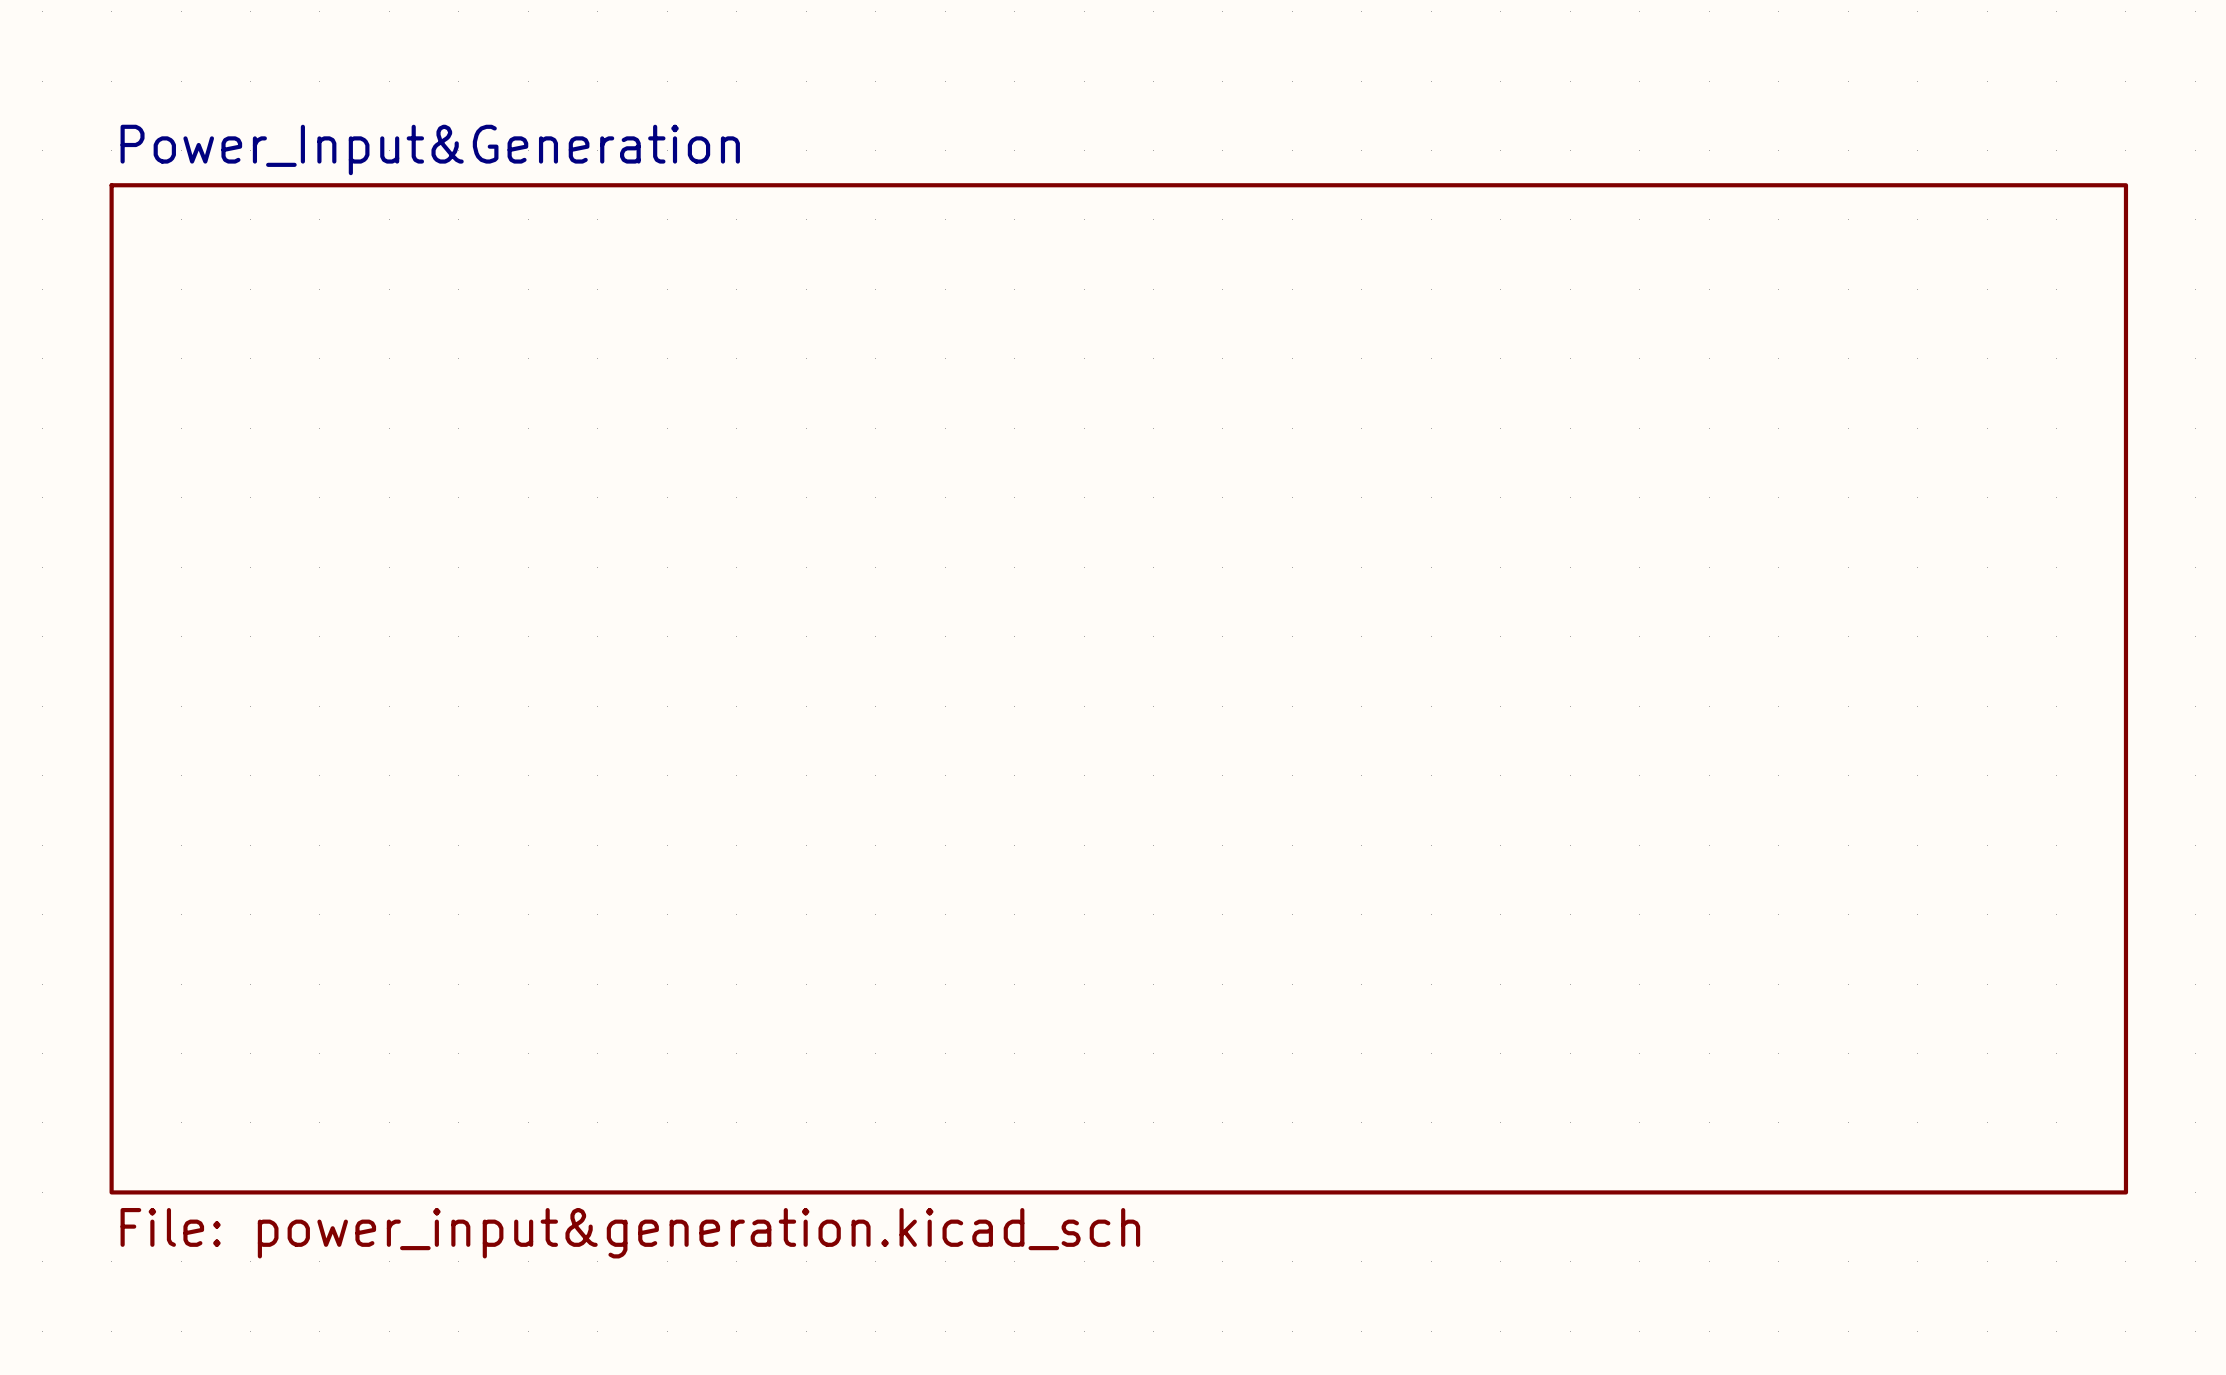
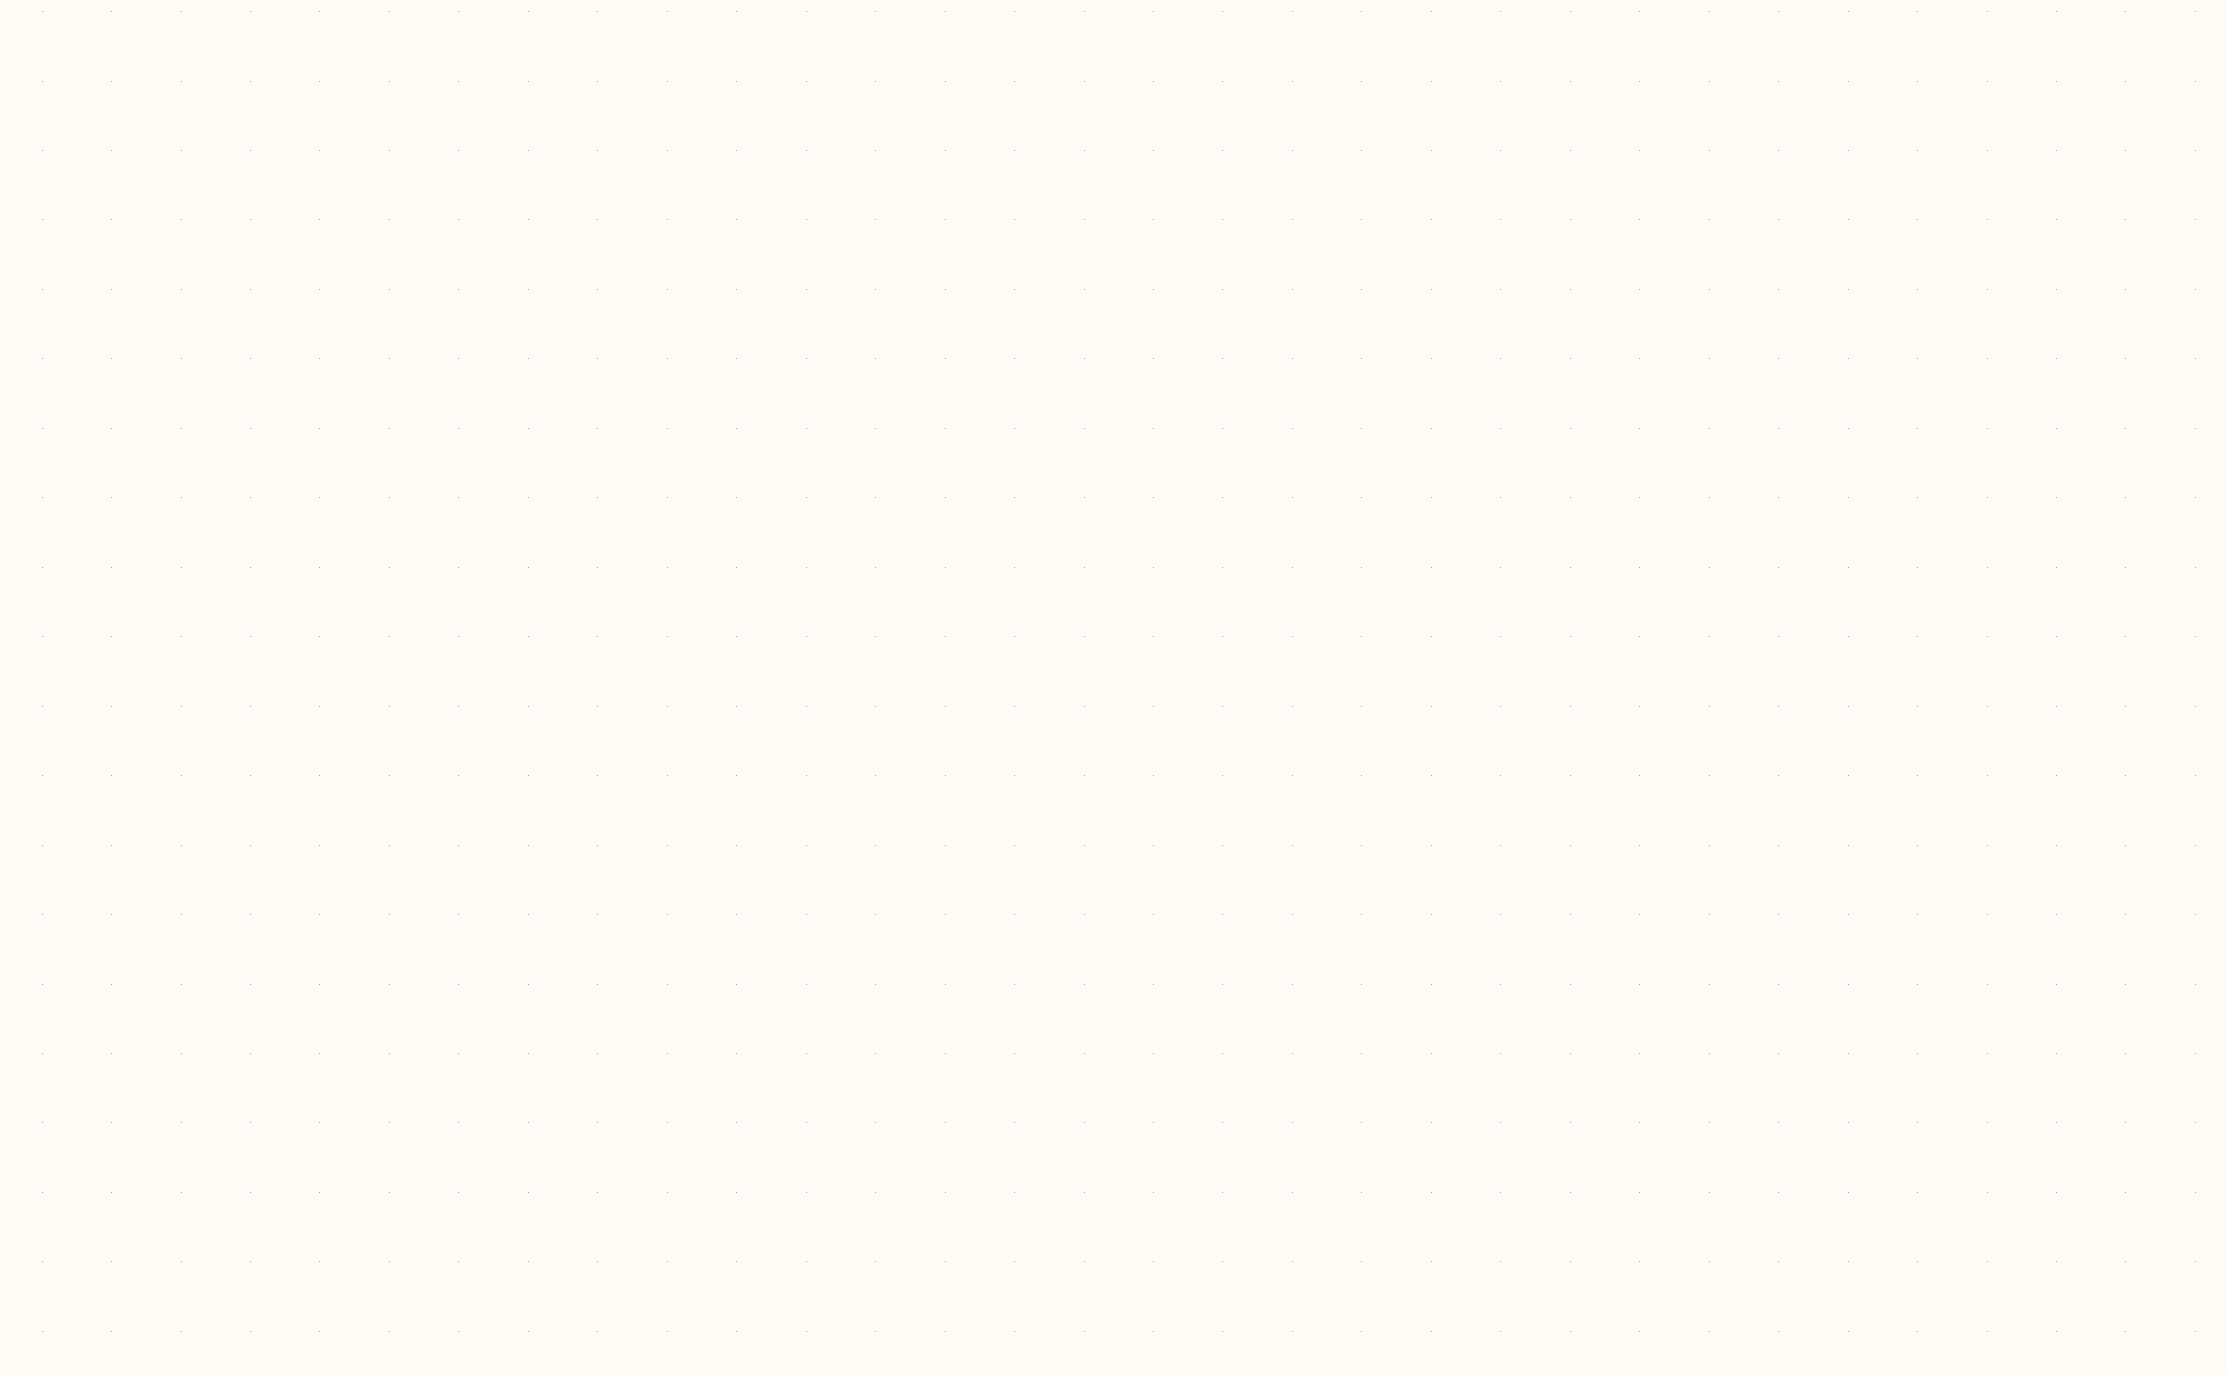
sheet Power_Input&Generation: File: power_input&generation.kicad_sch (1118, 688) -> none

